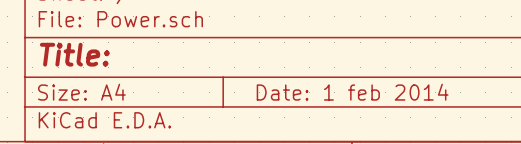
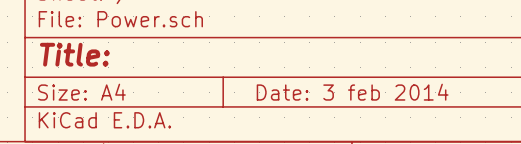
title block: Date: 1 feb 2014 (352, 92) -> Date: 3 feb 2014 (352, 92)

